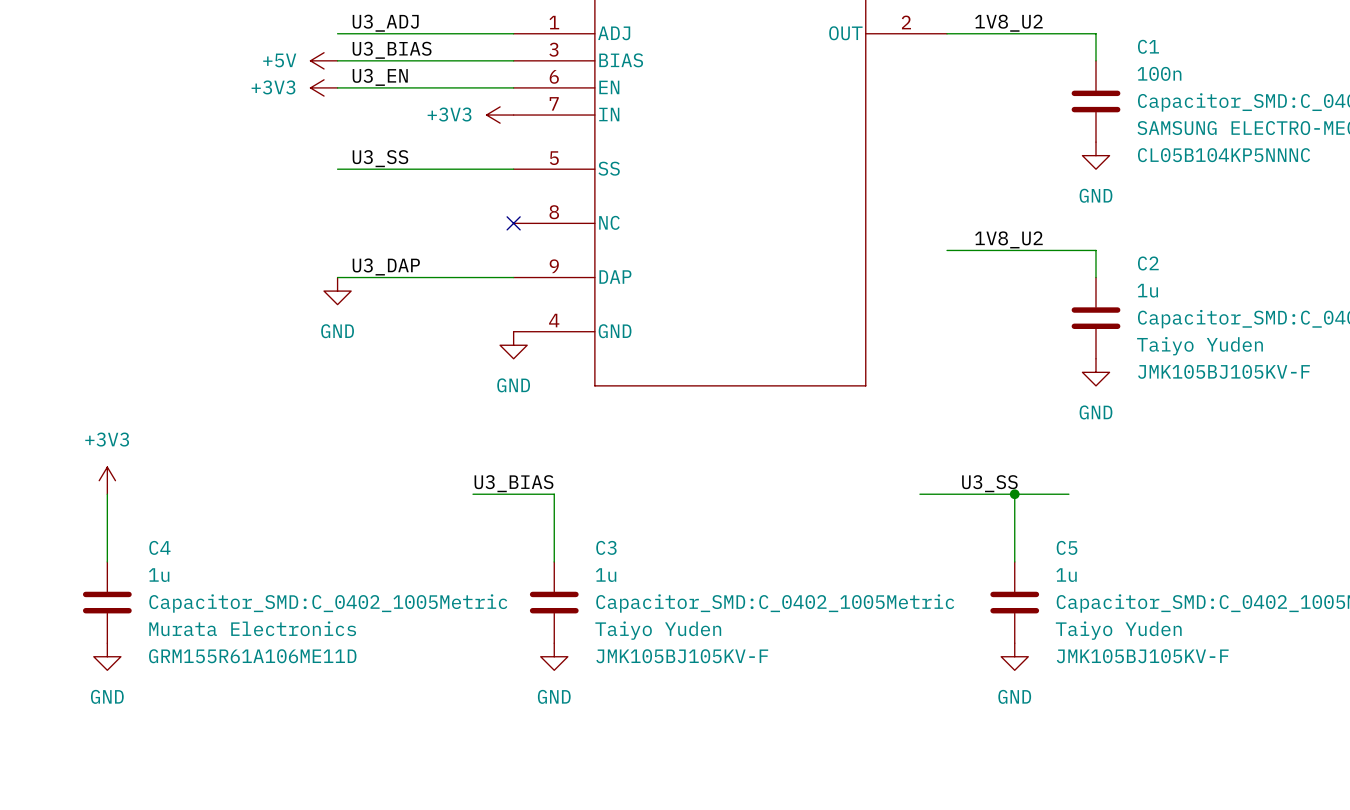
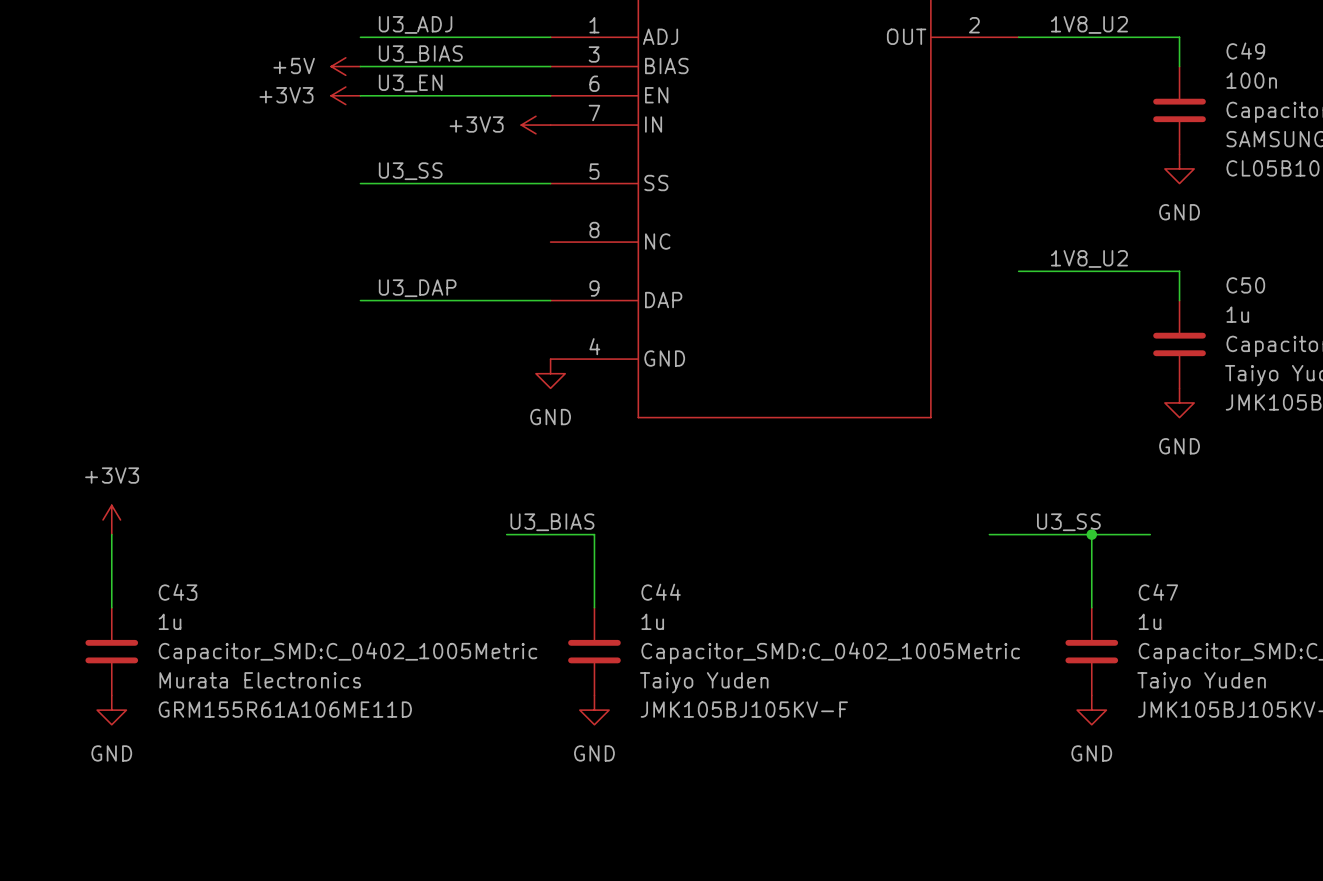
C1 name: C1 (1148, 46) -> C49 (1245, 51)
no-connect mark: (513, 223) -> none
C2 name: C2 (1148, 263) -> C50 (1245, 285)
power symbol: GND (337, 291) -> none
C4 name: C4 (159, 547) -> C43 (178, 592)
C3 name: C3 (606, 547) -> C44 (661, 592)
C5 name: C5 (1067, 547) -> C47 (1158, 592)

